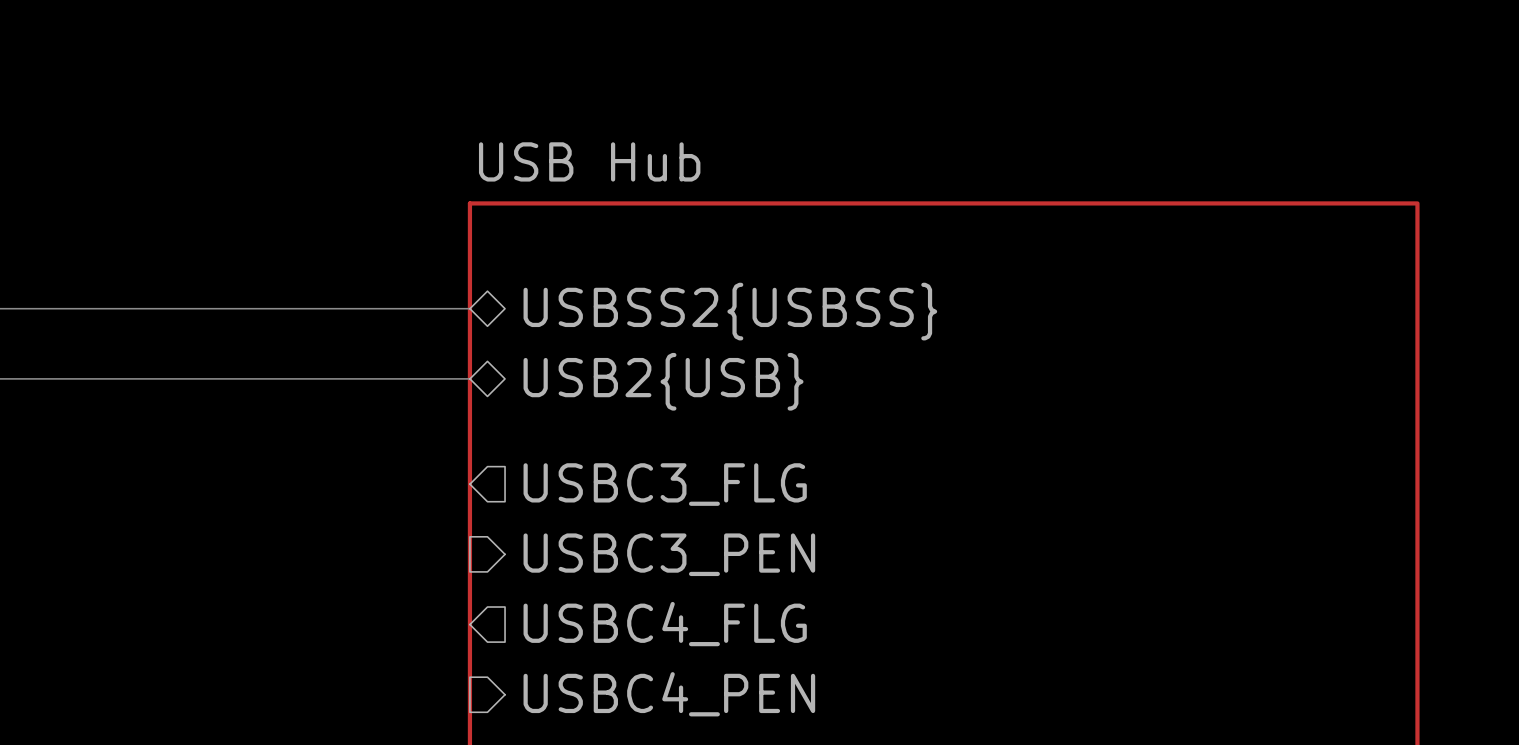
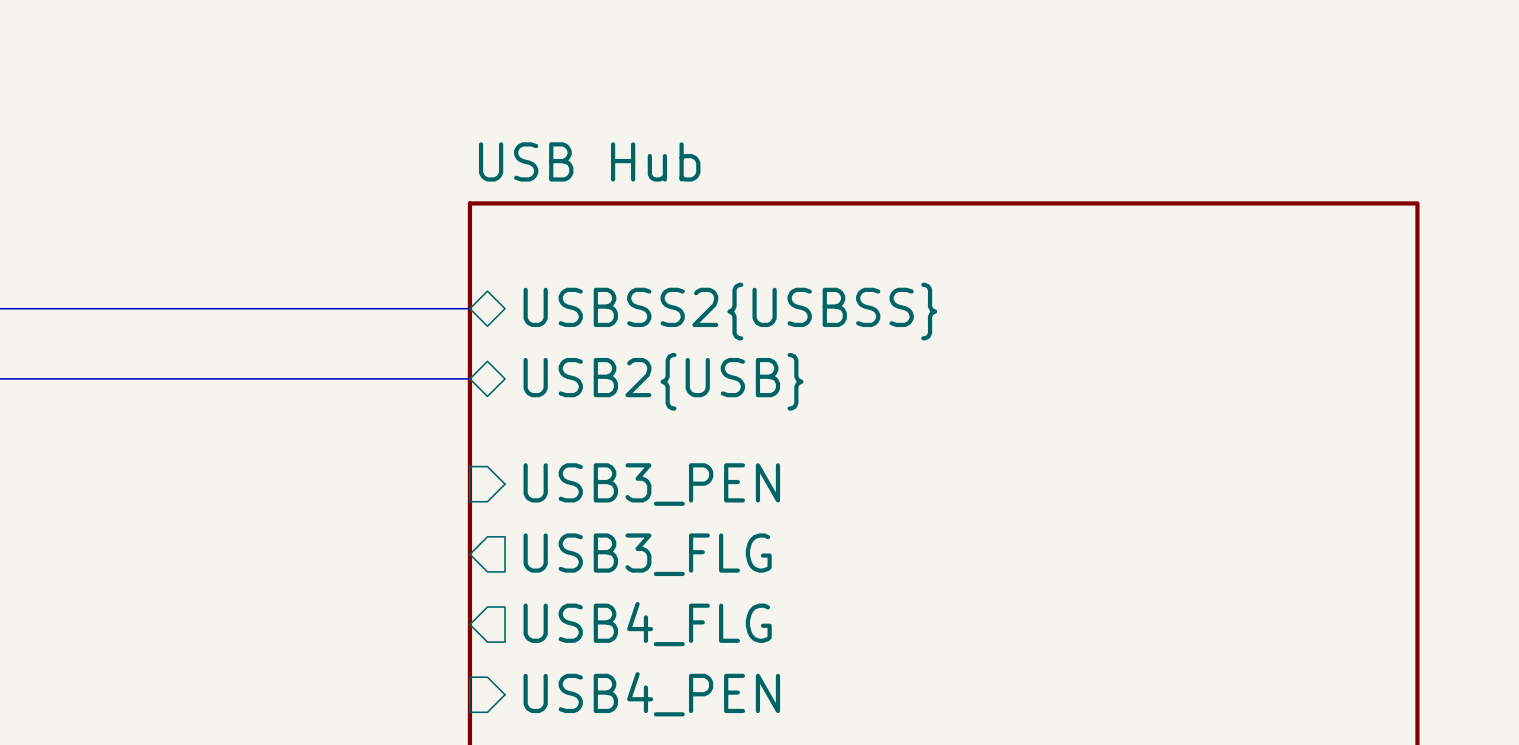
sheet pin shape: output (665, 484) -> input (651, 484)
sheet pin: USBC3_FLG (665, 484) -> USB3_PEN (651, 484)
sheet pin shape: input (669, 554) -> output (647, 554)
sheet pin: USBC3_PEN (669, 554) -> USB3_FLG (647, 554)
sheet pin: USBC4_FLG (665, 624) -> USB4_FLG (647, 624)
sheet pin: USBC4_PEN (669, 694) -> USB4_PEN (651, 694)

